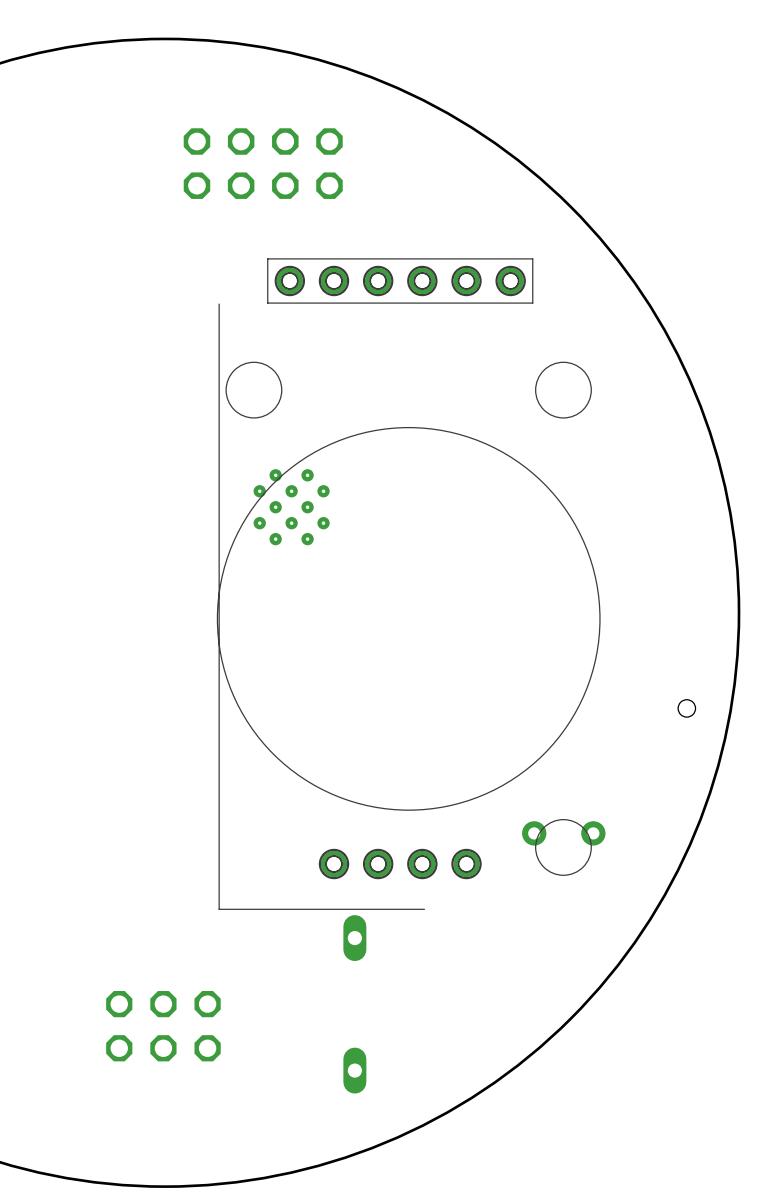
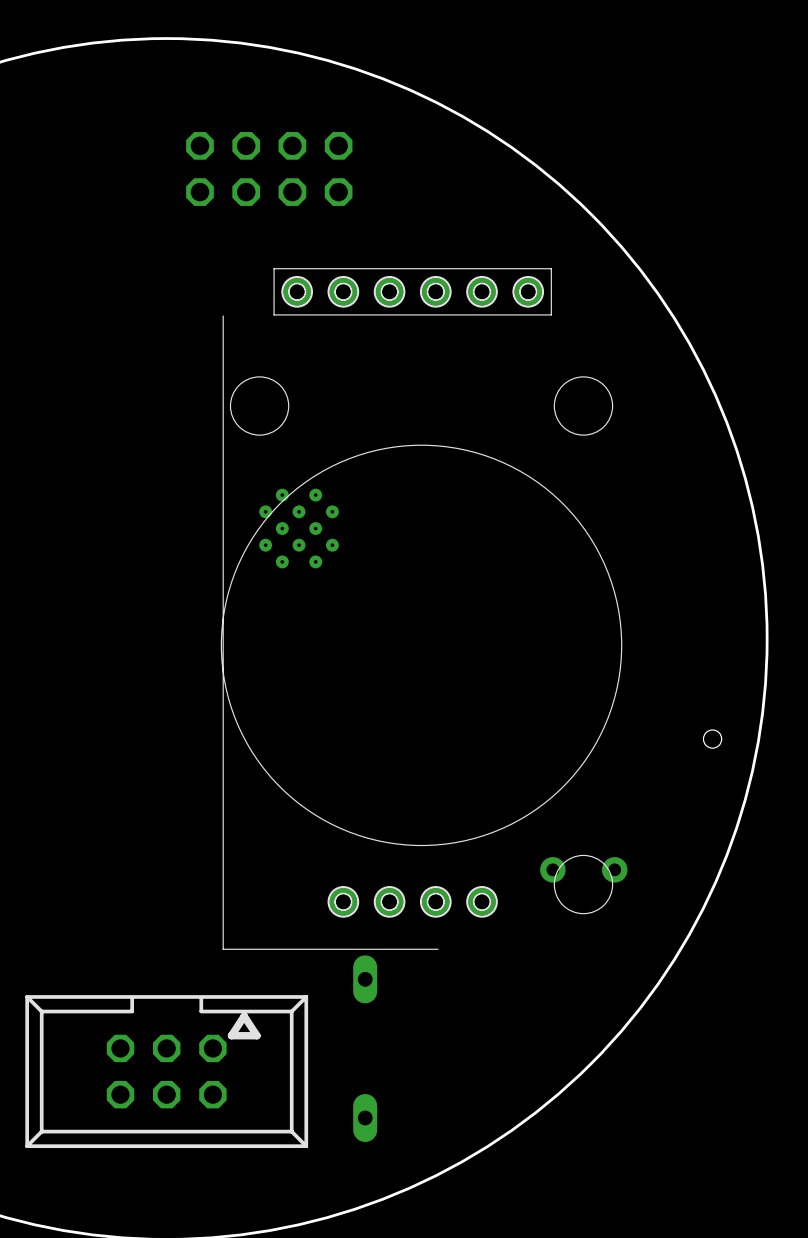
part side: top (163, 1026) -> bottom (166, 1071)

